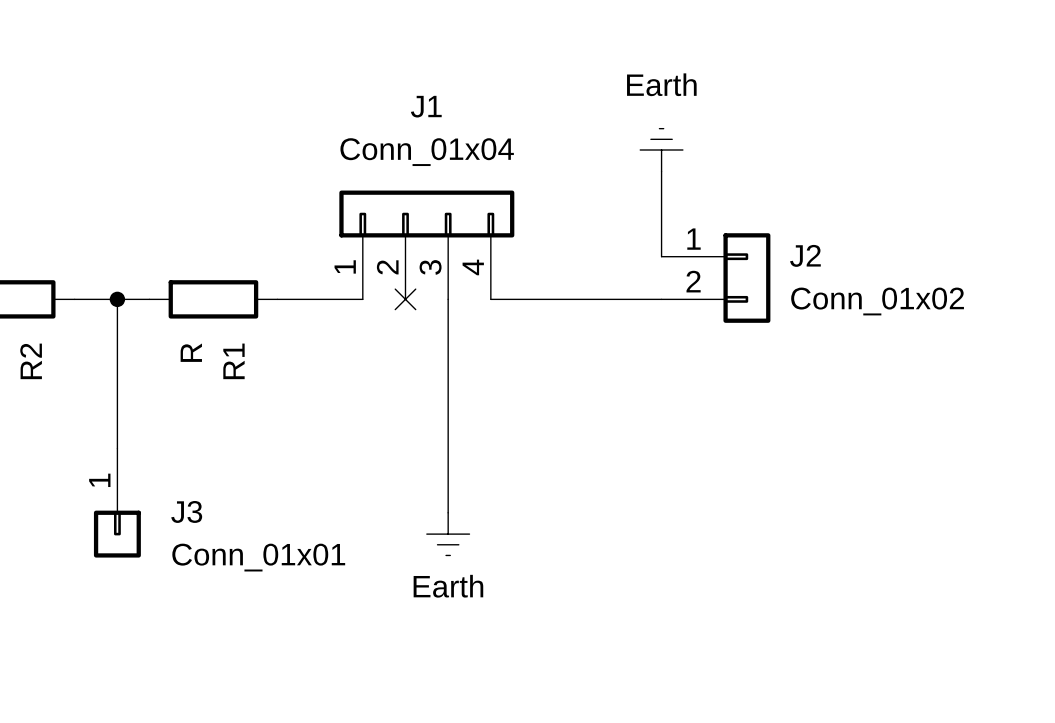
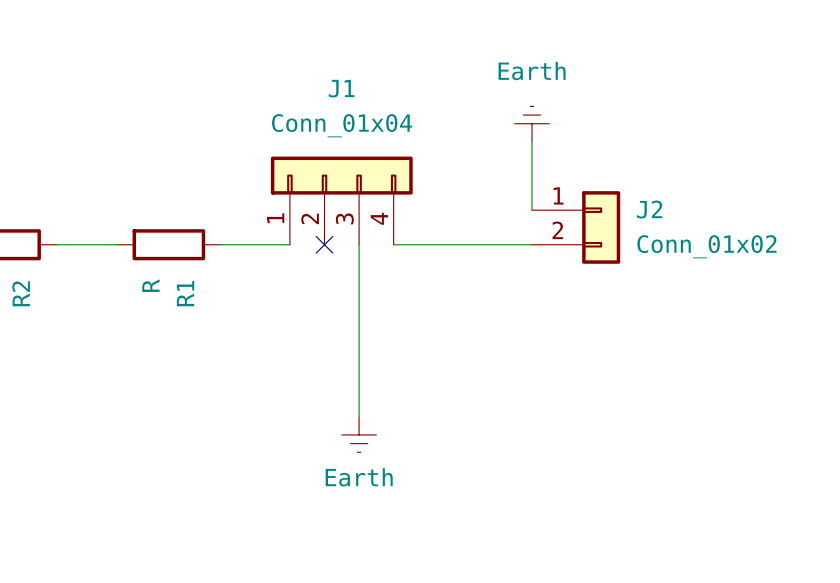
wire: (117, 299) (117, 448) -> none
junction: (117, 299) -> none
J3: Conn_01x01 (117, 503) -> none

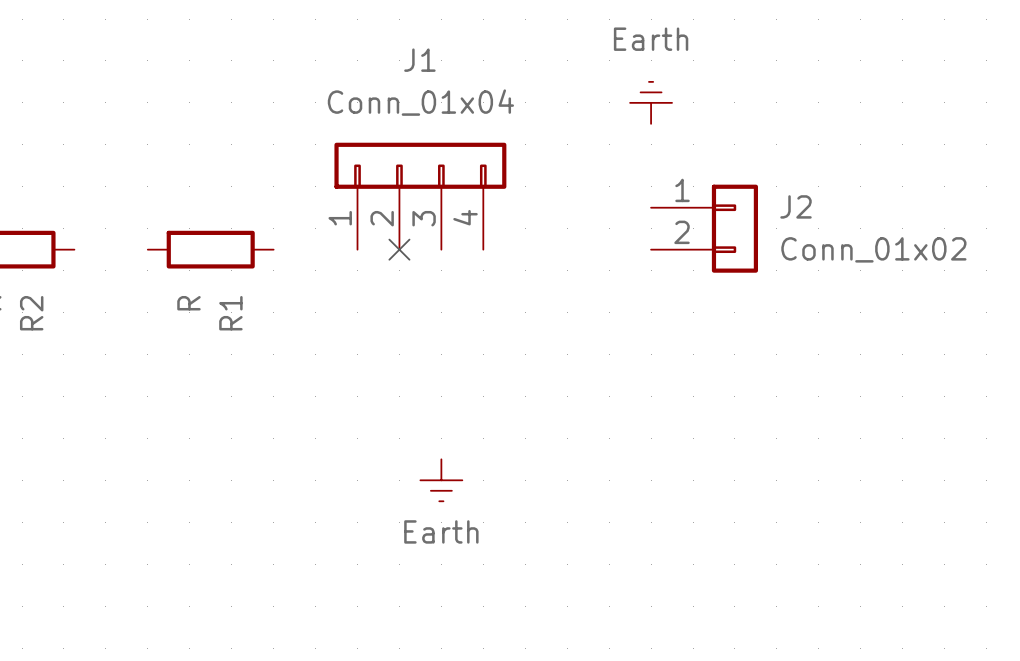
wire: (532, 141) (532, 210) -> none
wire: (56, 244) (117, 244) -> none
wire: (220, 244) (289, 244) -> none
wire: (359, 244) (359, 417) -> none
wire: (393, 244) (532, 244) -> none

